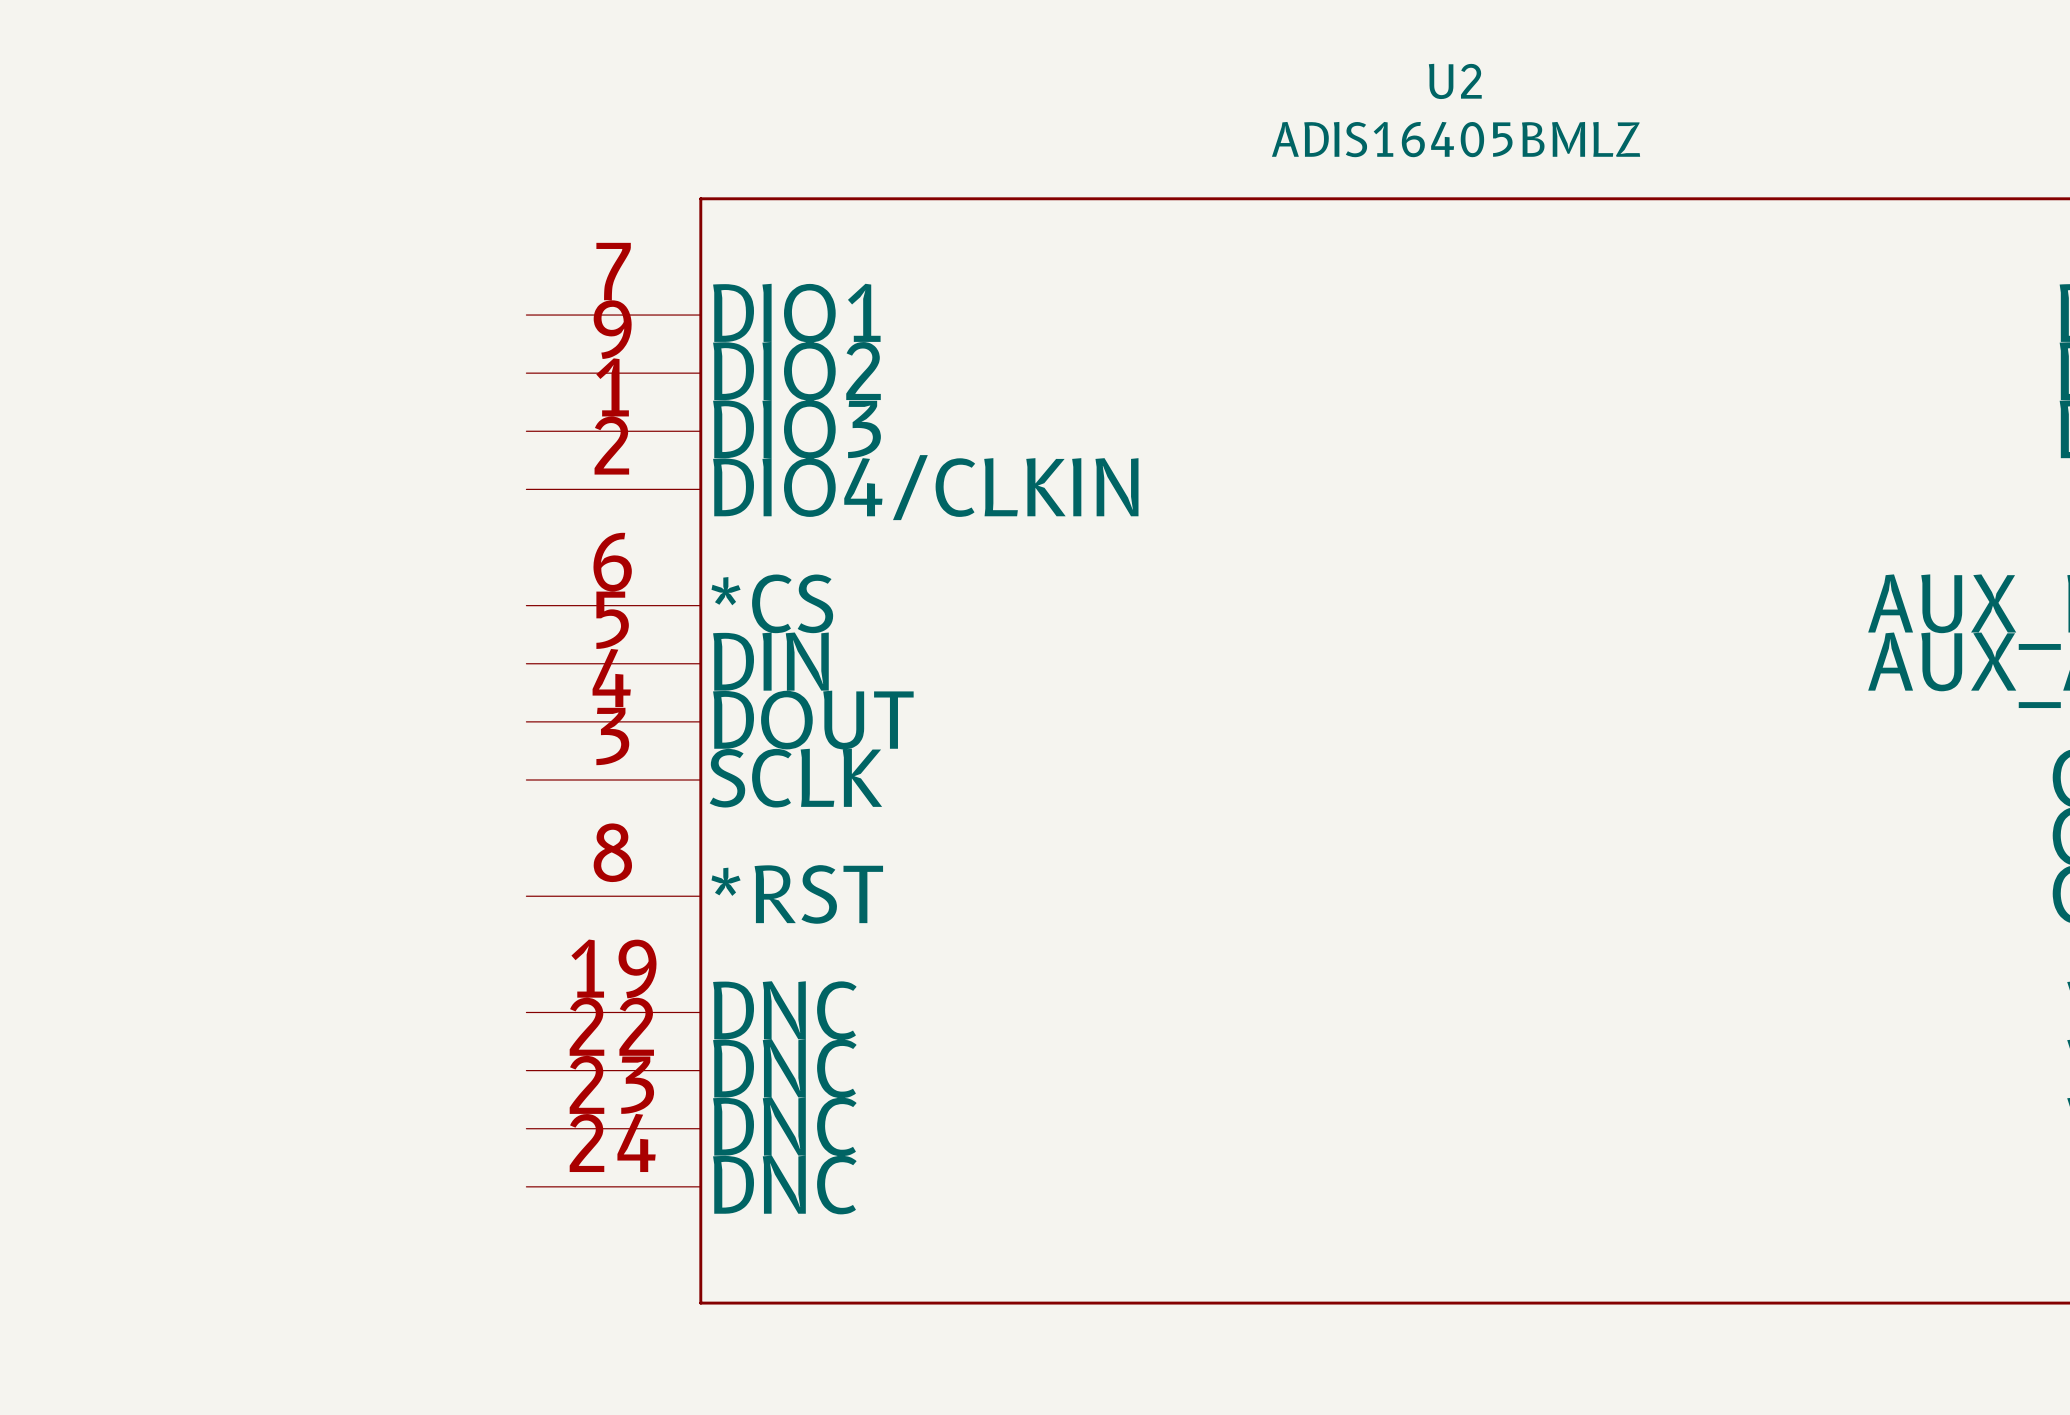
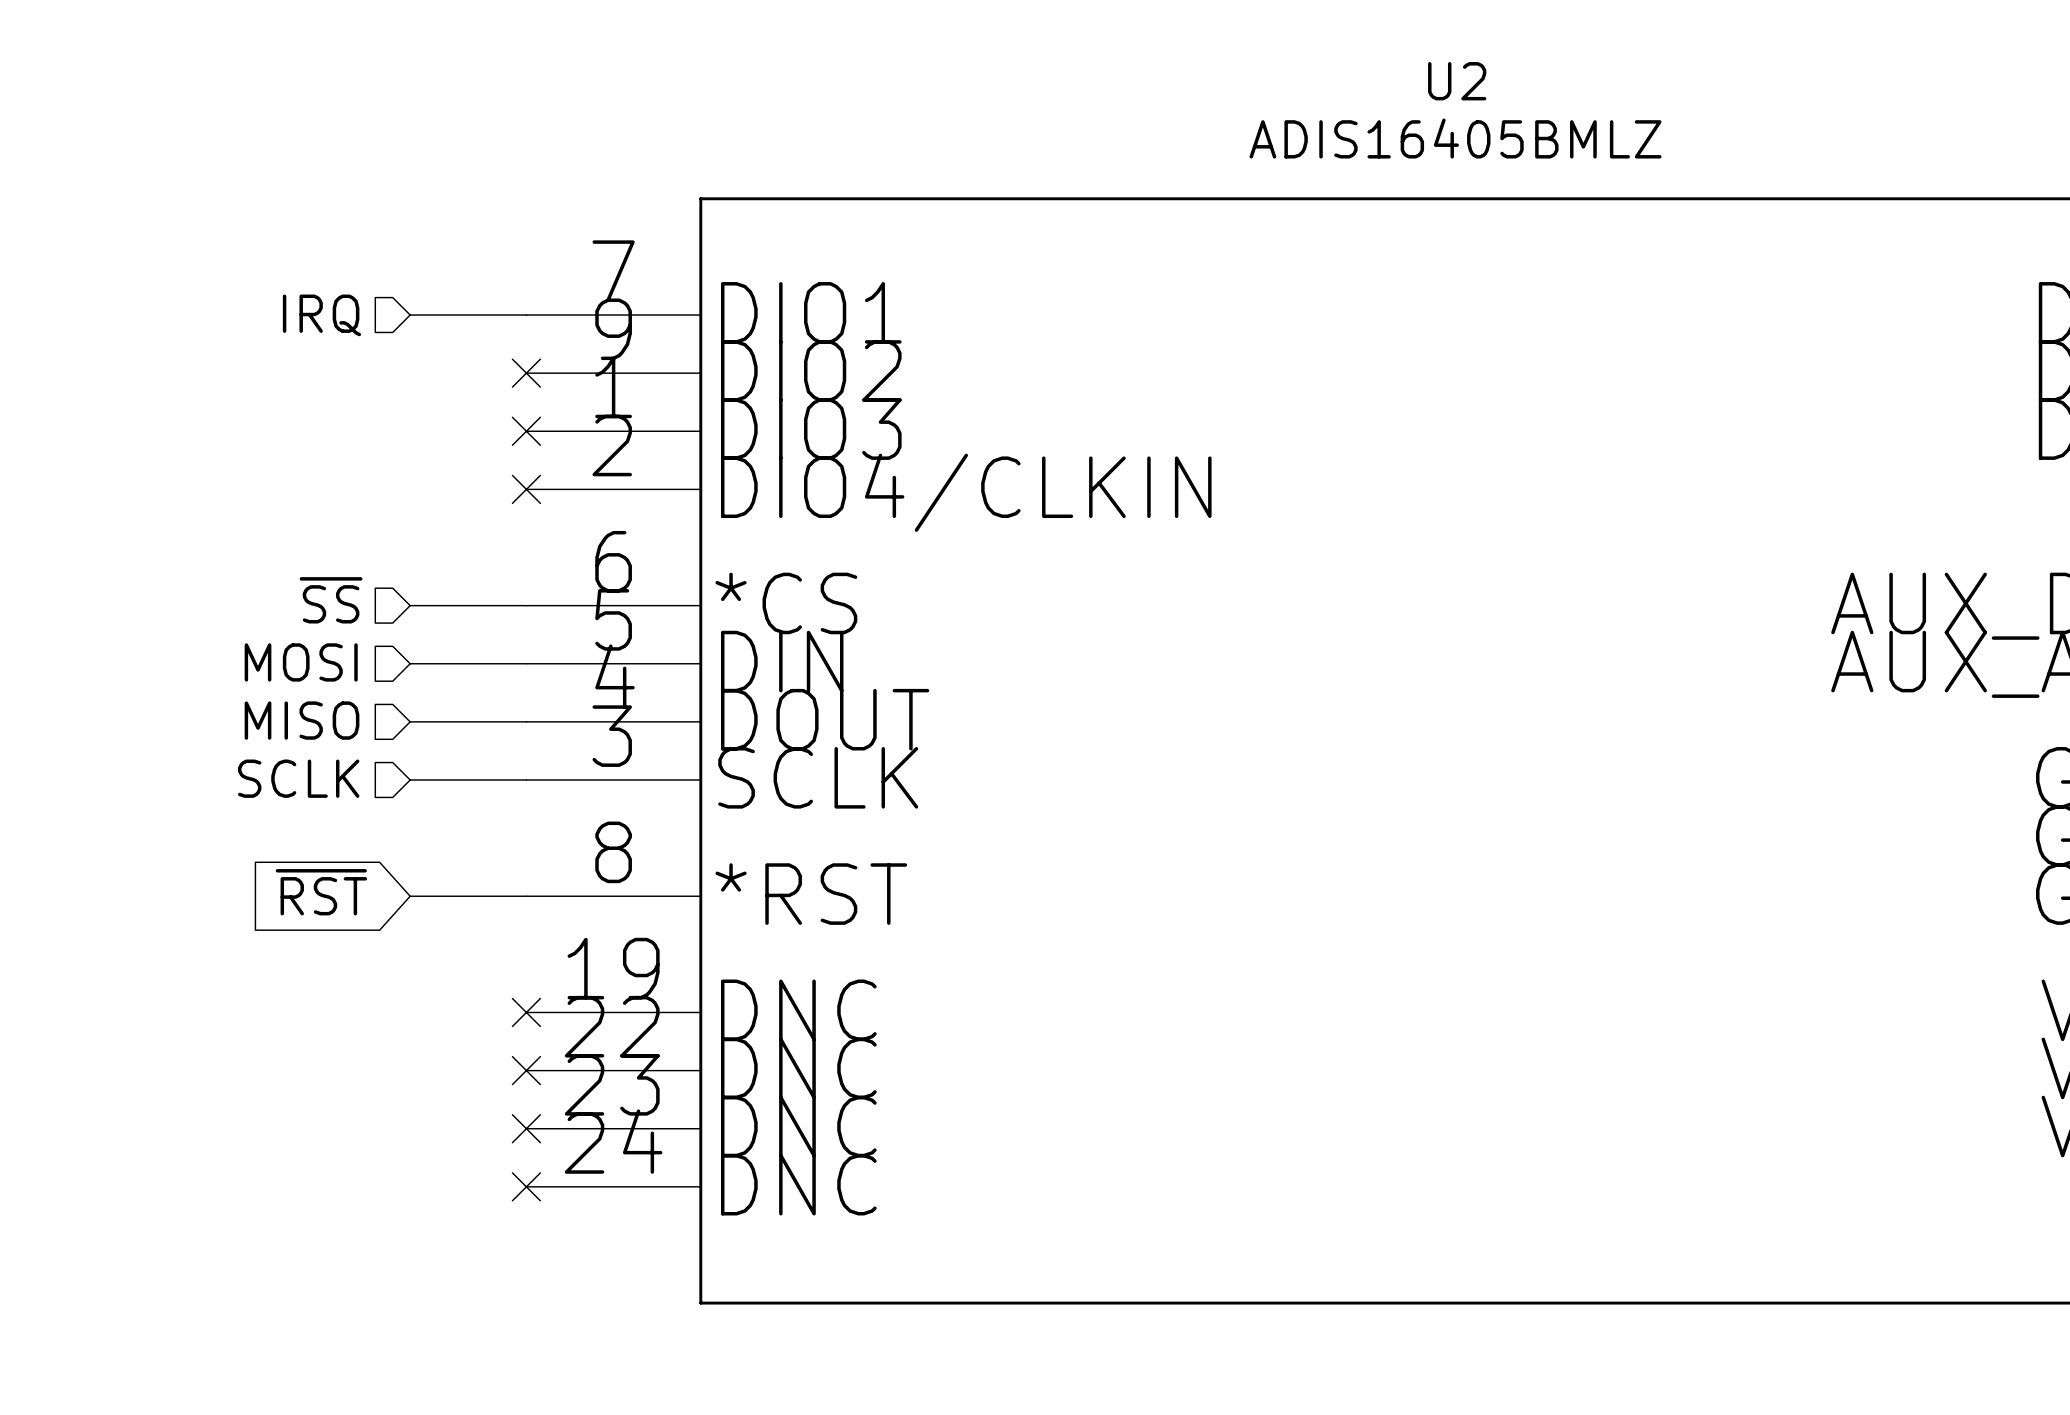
hierarchical label: none -> IRQ (321, 315)
wire: none -> (410, 315) (526, 315)
no-connect mark: none -> (526, 373)
no-connect mark: none -> (526, 431)
no-connect mark: none -> (526, 489)
hierarchical label: none -> ~{SS} (331, 600)
wire: none -> (410, 605) (526, 605)
hierarchical label: none -> MOSI (301, 662)
wire: none -> (410, 663) (526, 663)
hierarchical label: none -> MISO (302, 720)
wire: none -> (410, 721) (526, 721)
hierarchical label: none -> SCLK (298, 778)
wire: none -> (410, 779) (526, 779)
global label: none -> ~{RST} (321, 892)
wire: none -> (410, 896) (526, 896)
no-connect mark: none -> (526, 1012)
no-connect mark: none -> (526, 1070)
no-connect mark: none -> (526, 1128)
no-connect mark: none -> (526, 1186)

